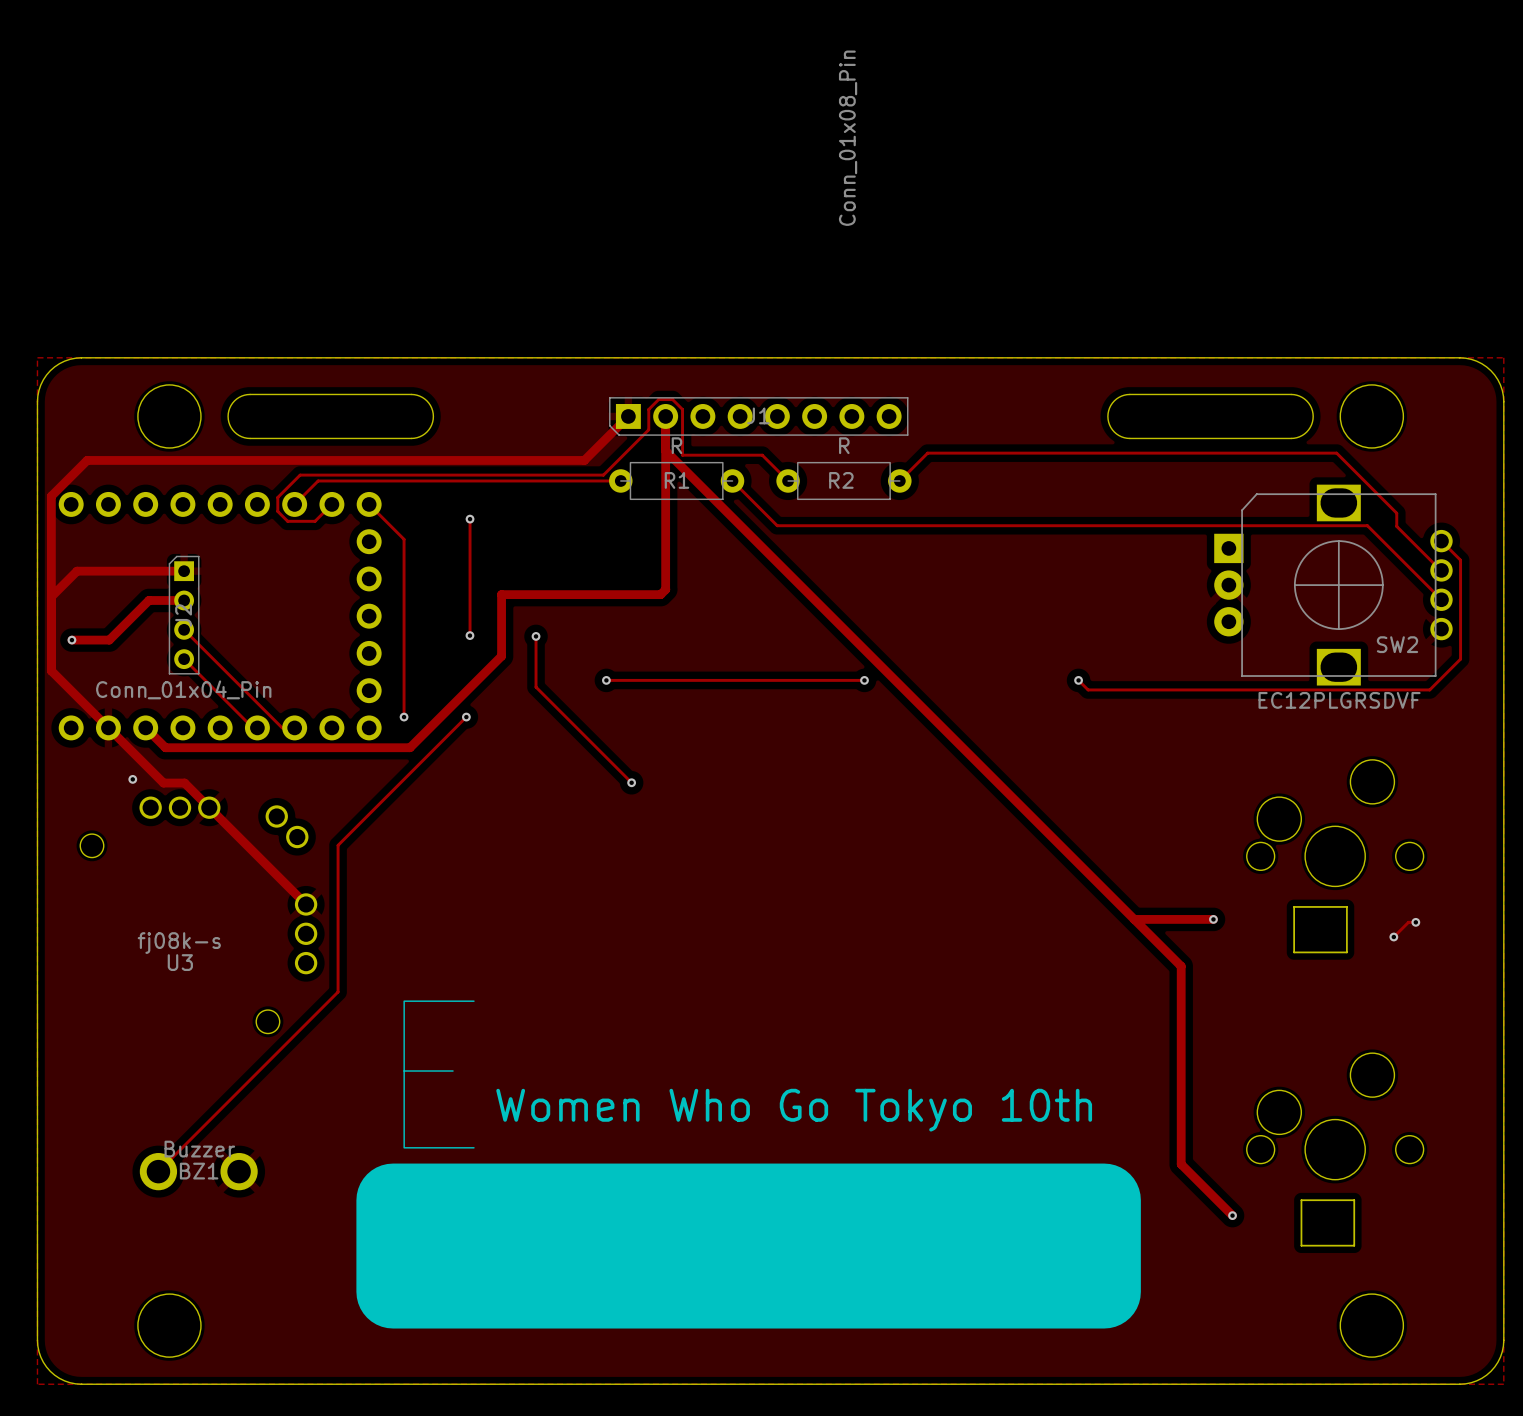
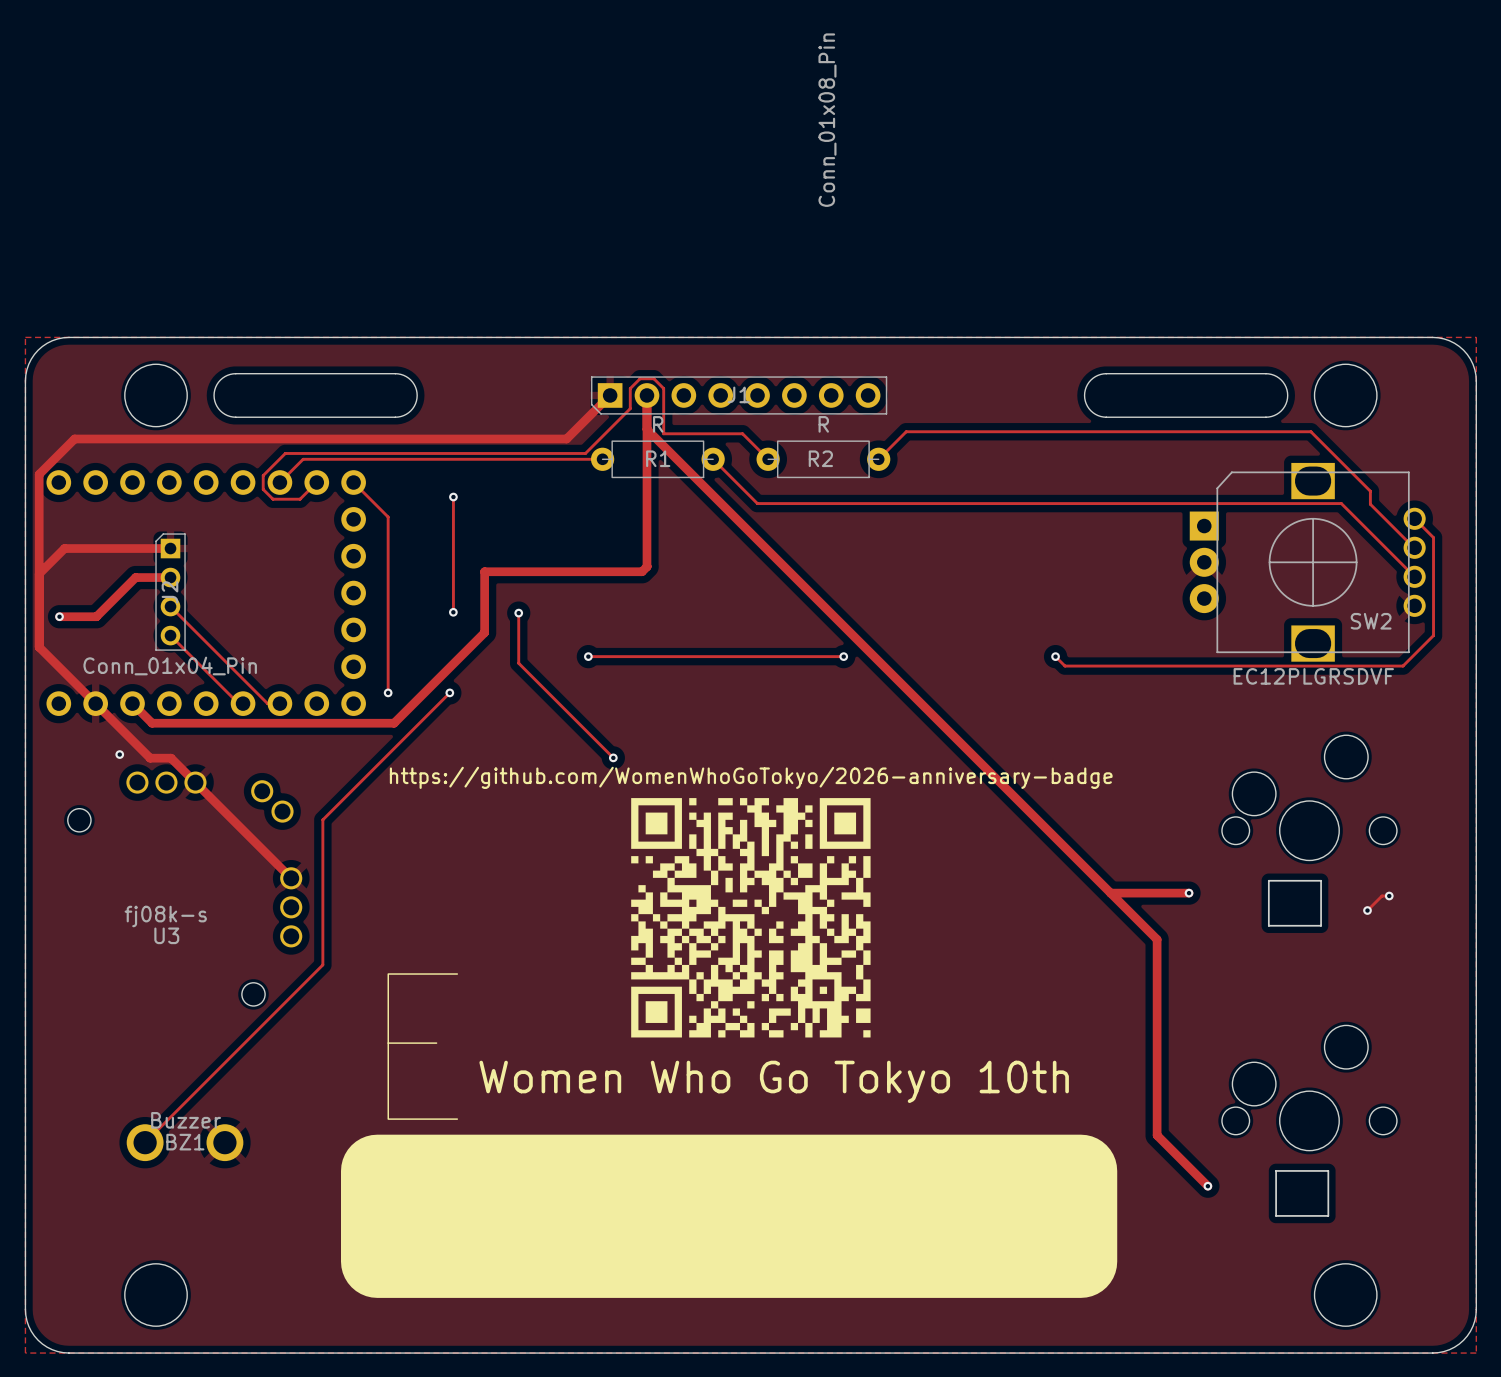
drawing: none -> [631, 798, 871, 1038]

